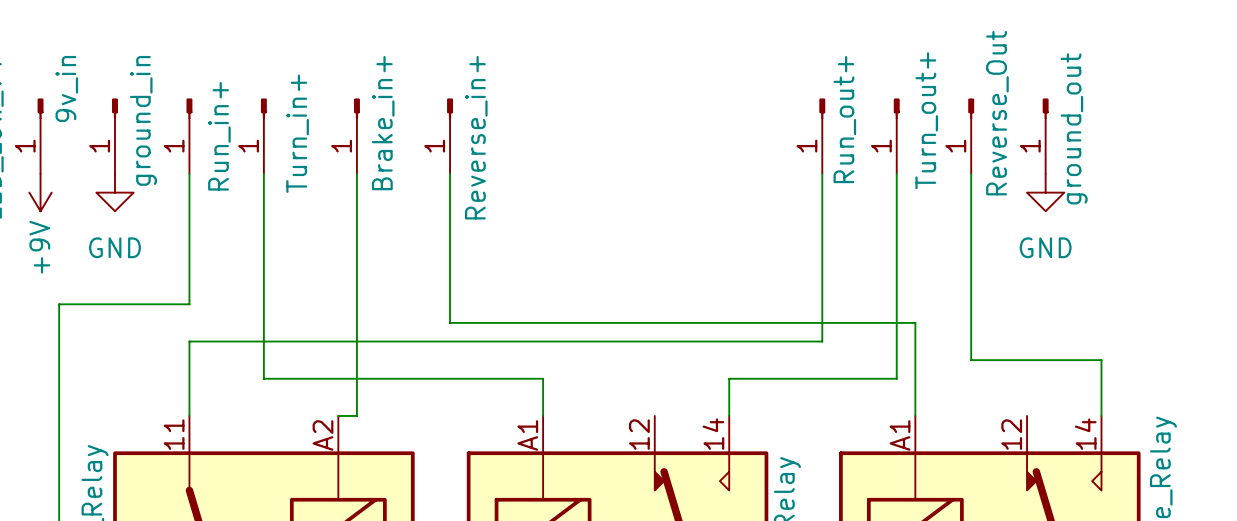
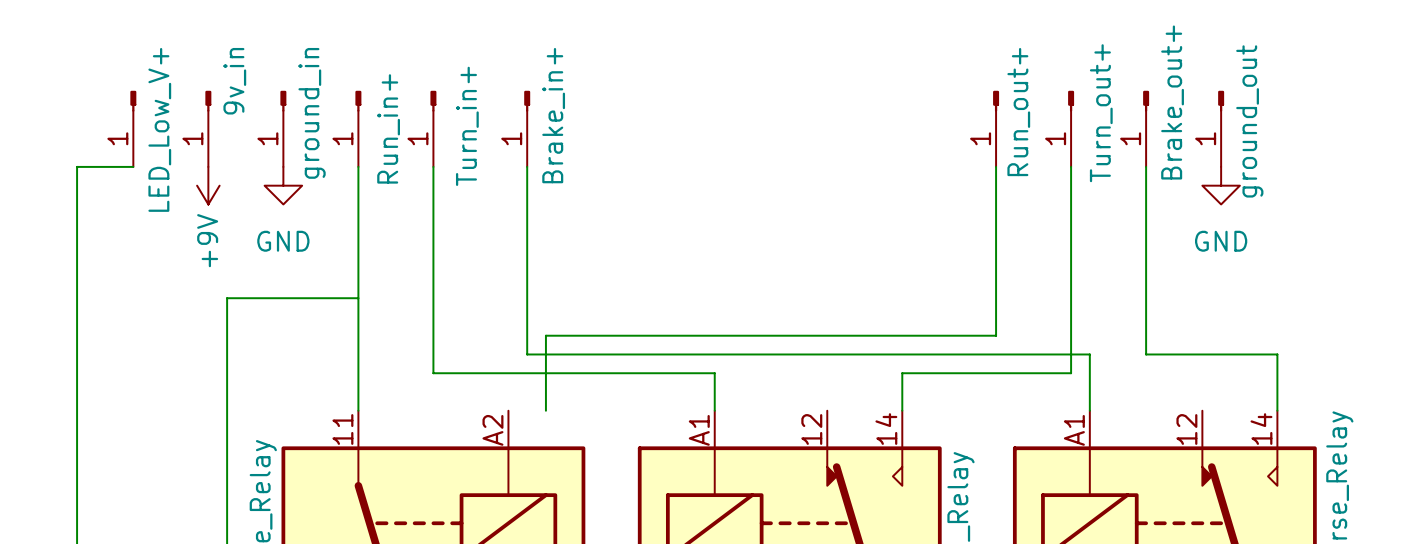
part value: Reverse_Out (997, 113) -> Brake_out+ (1172, 102)
part: Reverse_in+ (450, 136) -> none
wire: (450, 174) (450, 322) (915, 322) (915, 360) -> (527, 354) (1089, 354)
wire: (189, 341) (375, 341) -> (358, 335) (358, 298)
wire: none -> (545, 335) (545, 410)
wire: (356, 360) (356, 415) (338, 415) -> none

